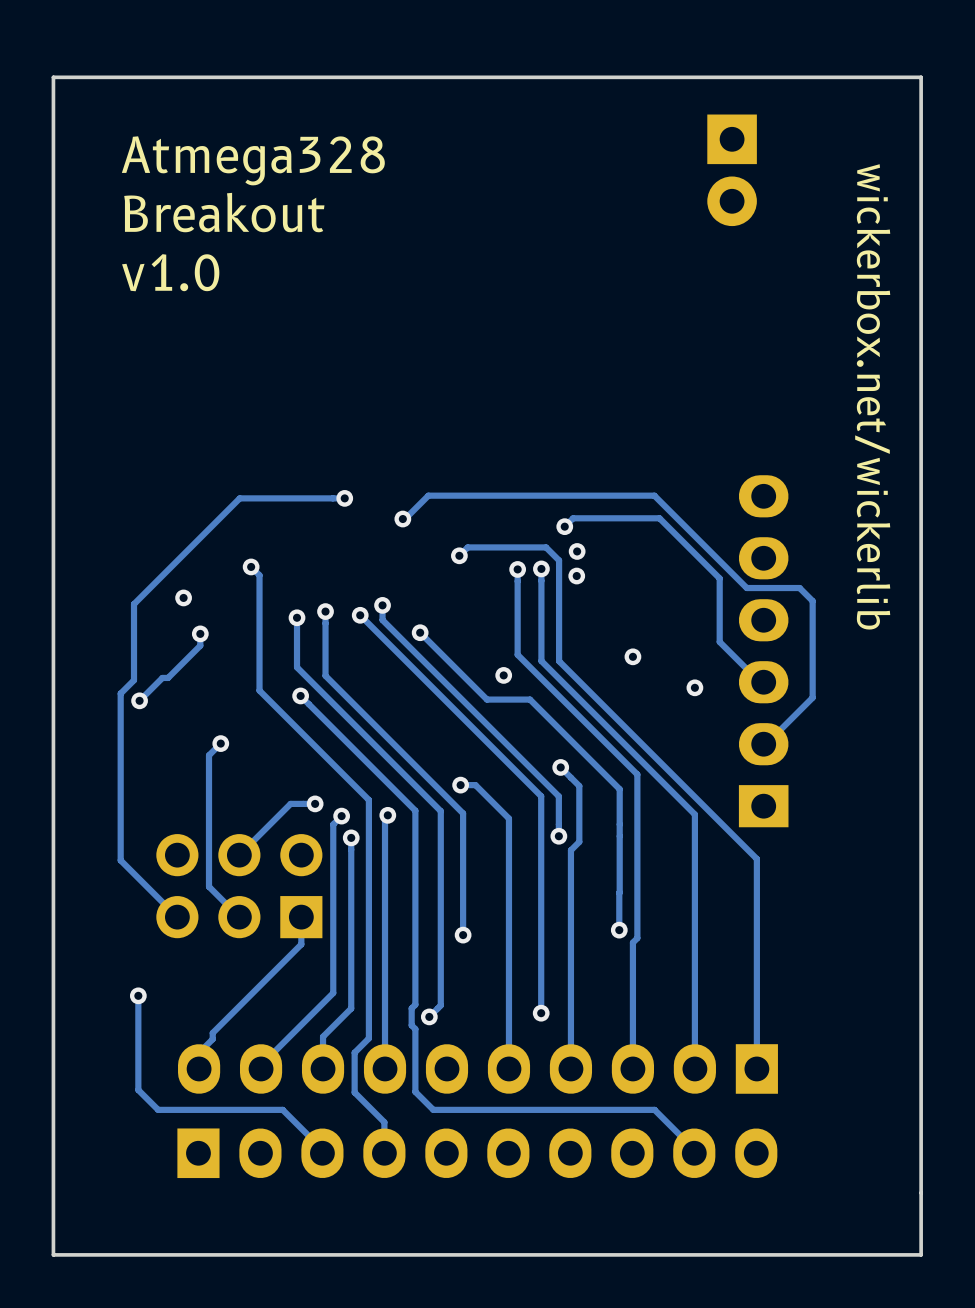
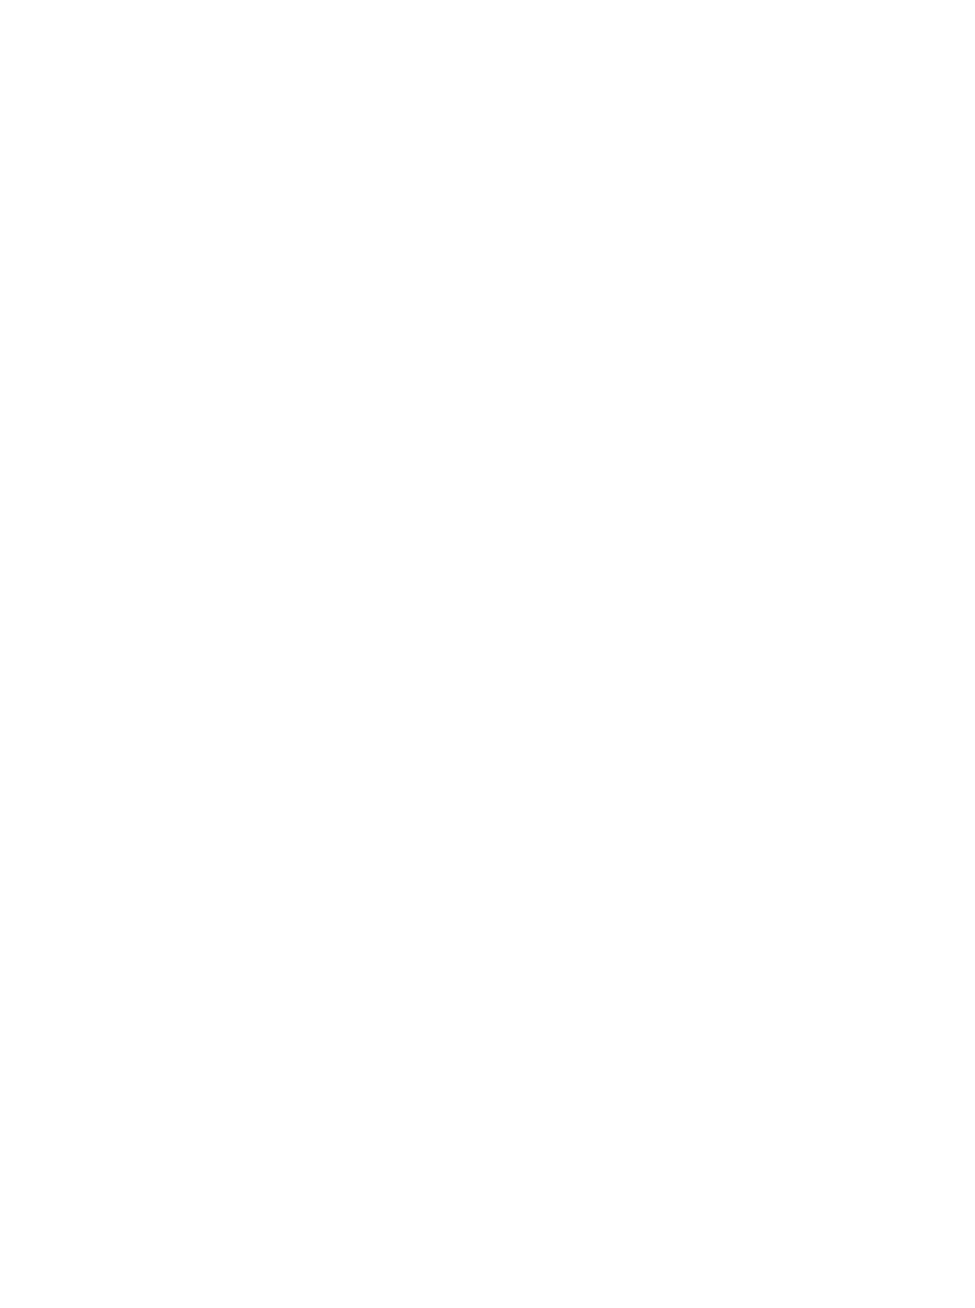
board edge: (921, 77) (921, 1254) (53, 1254) (53, 77) (921, 77) -> none
text: Atmega328 (253, 160) -> none
part: (732, 170) -> none
text: Breakout (224, 212) -> none
text: v1.0 (170, 272) -> none
text: wickerbox.net/wickerlib (872, 396) -> none
track: (344, 498) (239, 498) (134, 604) (134, 680) (120, 693) (120, 860) (177, 917) -> none
via: (344, 498) -> none
track: (402, 519) (428, 495) (654, 495) (746, 588) (799, 588) (812, 601) (812, 697) (766, 743) (763, 743) -> none
via: (402, 519) -> none
track: (564, 526) (573, 518) (659, 518) (719, 578) (719, 641) (759, 681) (766, 681) -> none
via: (564, 526) -> none
via: (577, 551) -> none
track: (459, 555) (467, 547) (546, 547) (559, 560) (559, 661) (756, 858) (756, 1068) -> none
via: (459, 555) -> none
track: (251, 566) (259, 575) (259, 690) (368, 799) (368, 1038) (354, 1052) (354, 1092) (384, 1122) (384, 1153) -> none
via: (251, 566) -> none
track: (541, 568) (541, 661) (694, 814) (694, 1068) -> none
via: (541, 568) -> none
track: (517, 569) (517, 654) (637, 774) (637, 938) (632, 942) (632, 1068) -> none
via: (517, 569) -> none
via: (576, 576) -> none
via: (183, 597) -> none
track: (382, 605) (382, 620) (558, 796) (558, 836) -> none
via: (382, 605) -> none
track: (325, 611) (325, 675) (463, 813) (463, 935) -> none
via: (325, 611) -> none
track: (360, 615) (541, 796) (541, 1013) -> none
via: (360, 615) -> none
track: (297, 617) (297, 667) (440, 811) (440, 1005) (429, 1016) -> none
via: (297, 617) -> none
track: (420, 632) (487, 699) (530, 699) (619, 789) (619, 930) -> none
via: (420, 632) -> none
track: (200, 633) (200, 645) (168, 677) (162, 677) (139, 700) -> none
via: (200, 633) -> none
part: (763, 651) -> none
via: (632, 656) -> none
via: (503, 675) -> none
via: (694, 687) -> none
track: (300, 695) (415, 810) (415, 1004) (411, 1008) (411, 1025) (415, 1029) (415, 1091) (433, 1109) (654, 1109) (694, 1149) (694, 1153) -> none
via: (300, 695) -> none
via: (139, 700) -> none
track: (220, 743) (209, 755) (209, 886) (239, 917) -> none
via: (220, 743) -> none
track: (560, 767) (579, 786) (579, 841) (570, 850) (570, 1068) -> none
via: (560, 767) -> none
track: (460, 785) (475, 785) (508, 818) (508, 1068) -> none
via: (460, 785) -> none
track: (315, 803) (290, 803) (239, 855) -> none
via: (315, 803) -> none
track: (387, 815) (385, 818) (385, 1068) -> none
via: (387, 815) -> none
track: (341, 816) (333, 824) (333, 993) (261, 1065) (261, 1068) -> none
via: (341, 816) -> none
via: (558, 836) -> none
track: (351, 837) (351, 1008) (323, 1036) (323, 1068) -> none
via: (351, 837) -> none
part: (239, 886) -> none
track: (301, 917) (301, 944) (212, 1033) (212, 1039) (199, 1052) (199, 1068) -> none
via: (619, 930) -> none
via: (463, 935) -> none
track: (138, 995) (138, 1090) (158, 1109) (282, 1109) (322, 1149) (322, 1153) -> none
via: (138, 995) -> none
via: (541, 1013) -> none
via: (429, 1016) -> none
part: (477, 1068) -> none
part: (477, 1153) -> none

